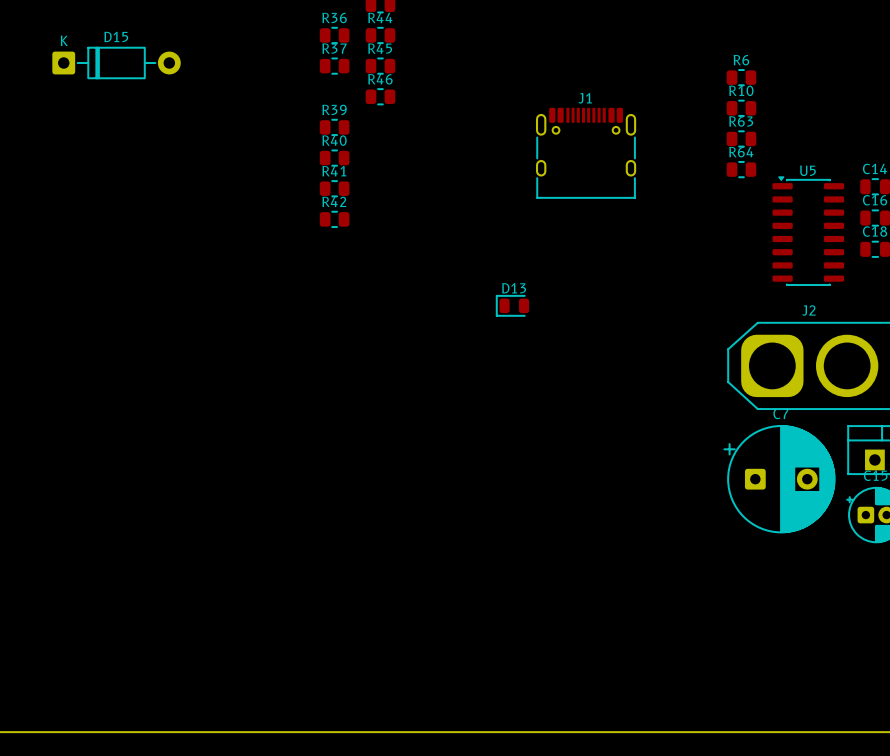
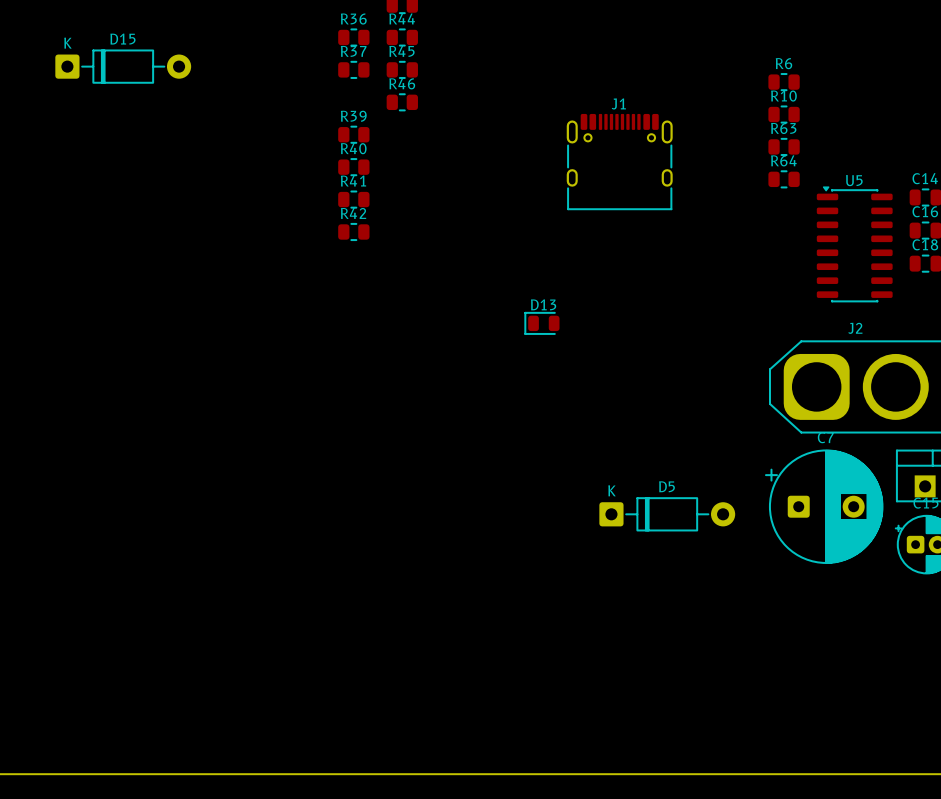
D5: none -> (667, 514)

